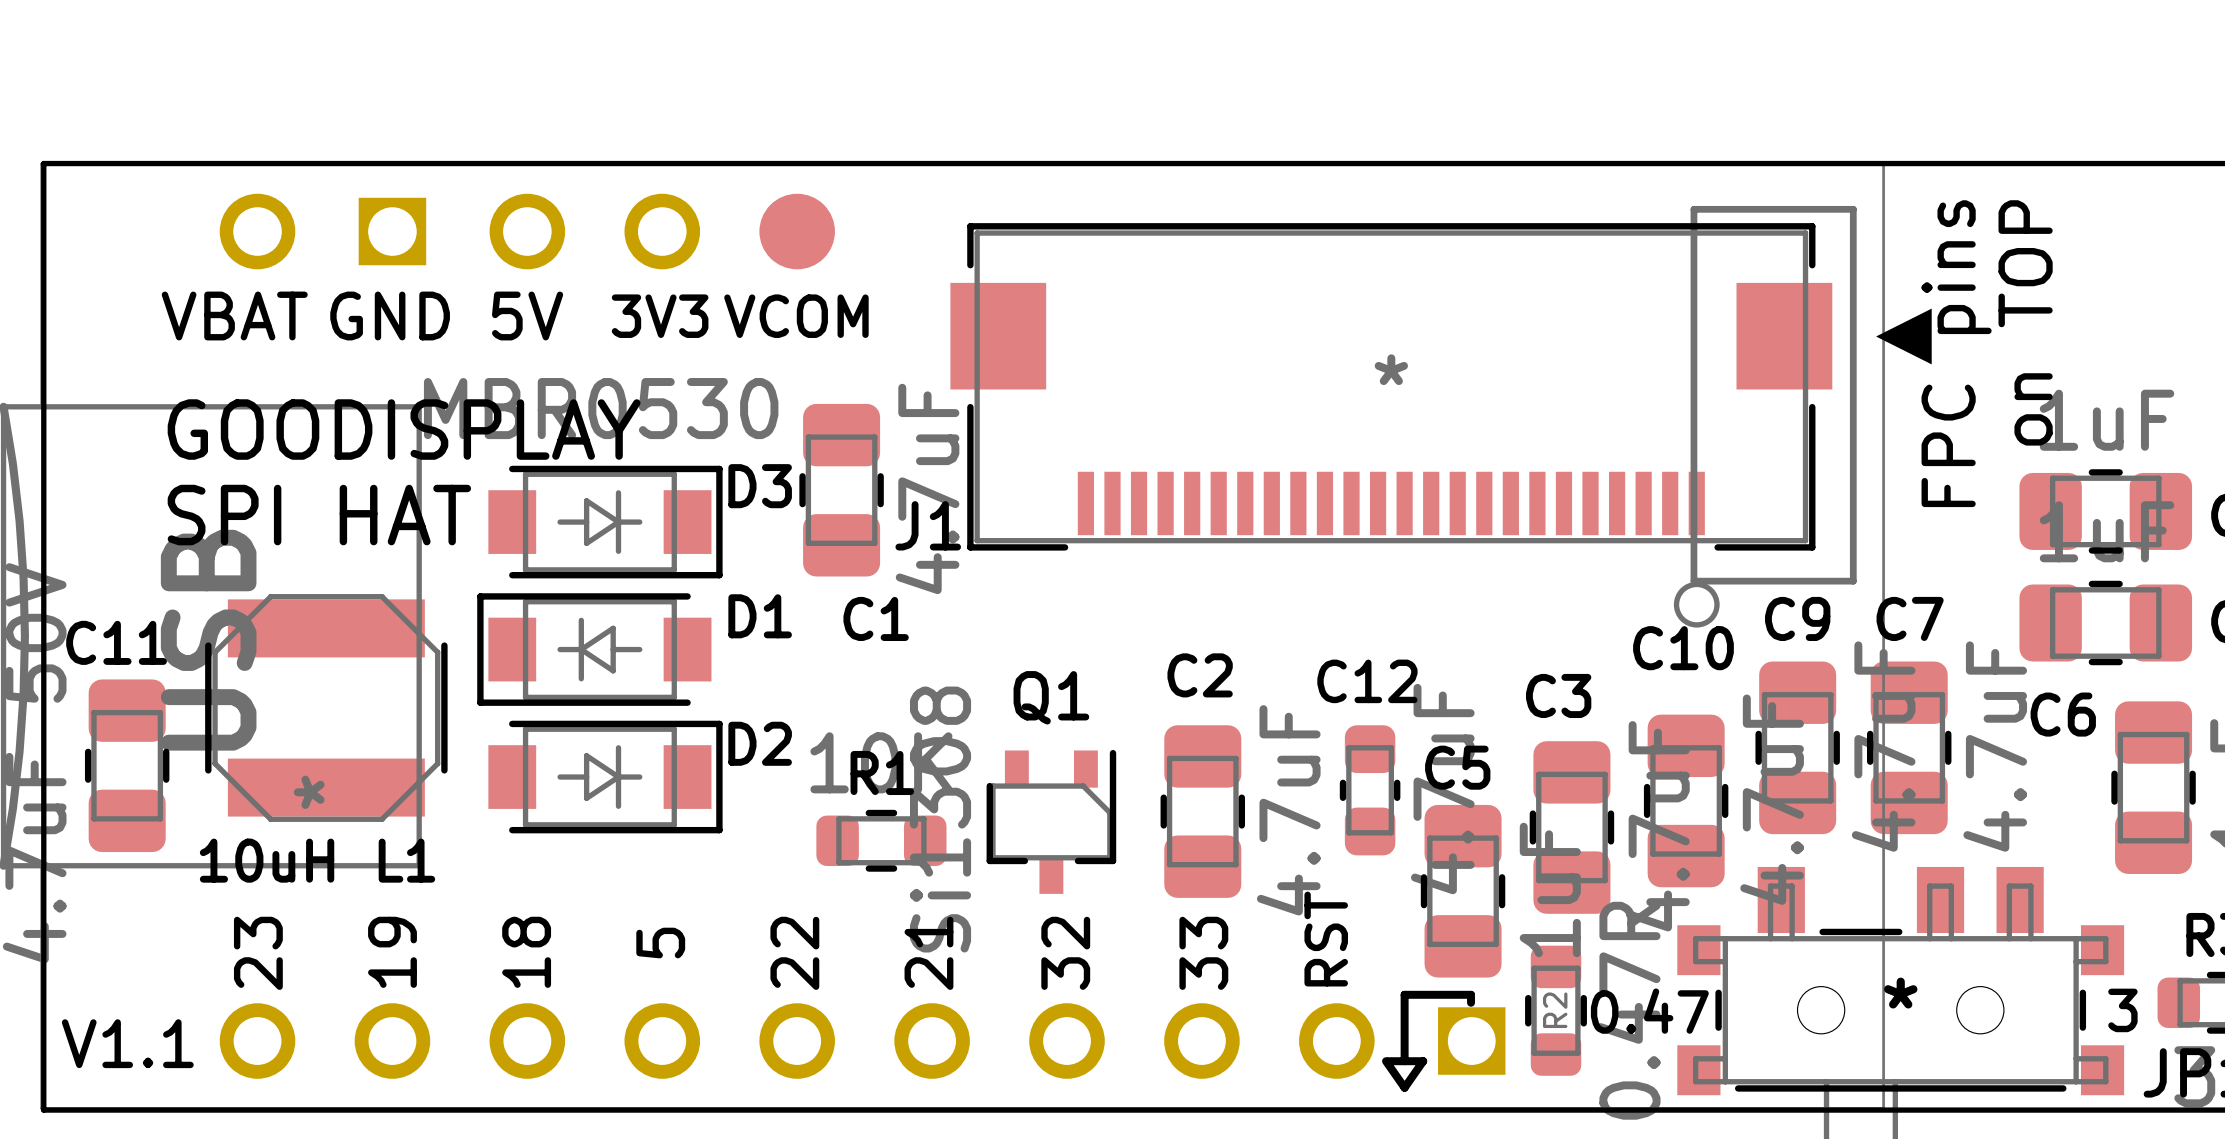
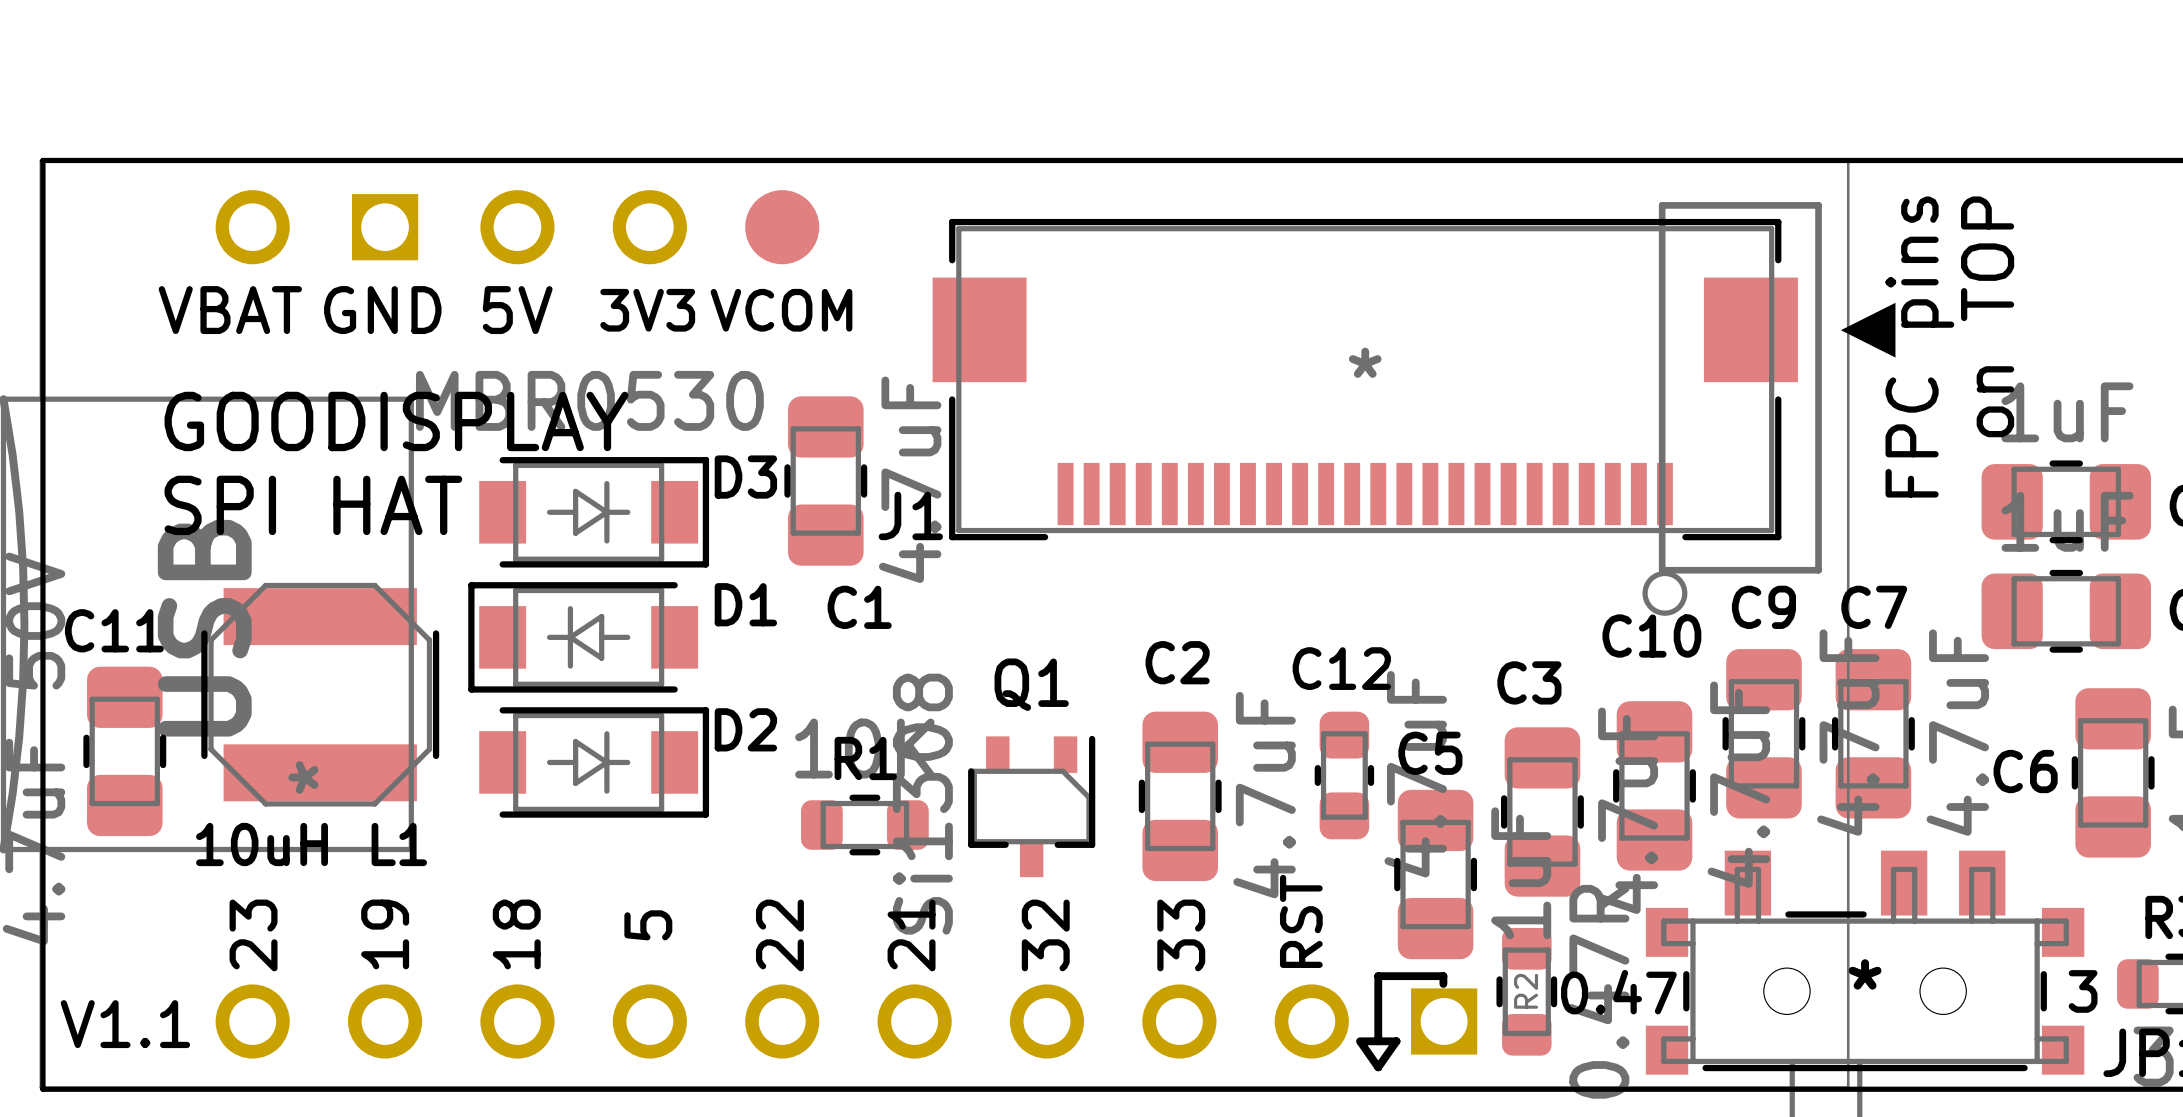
C6 name position: C6 (2063, 714) -> C6 (2025, 771)

